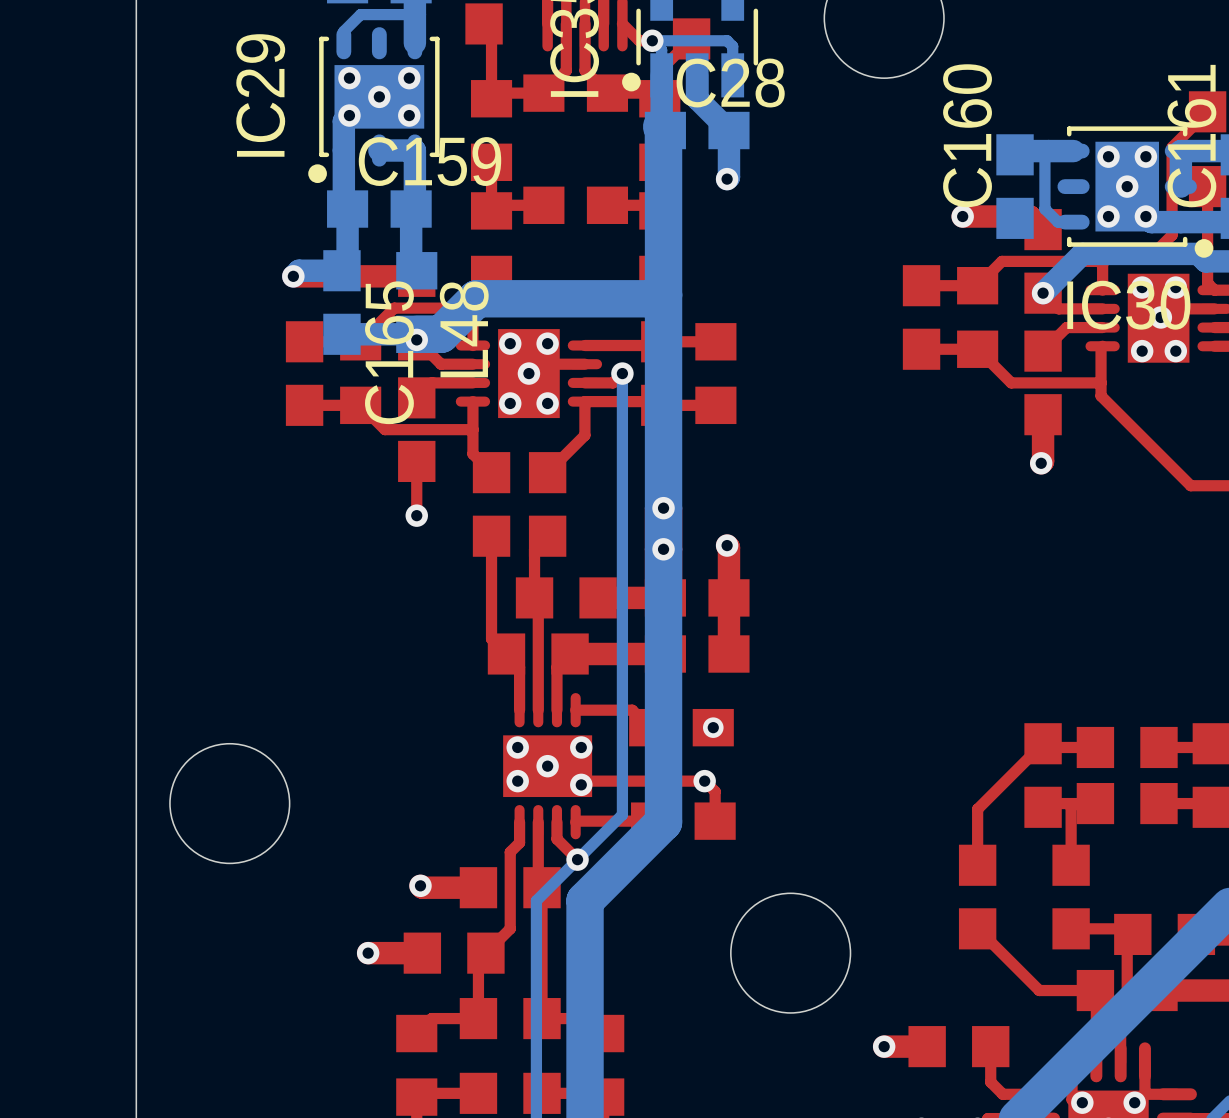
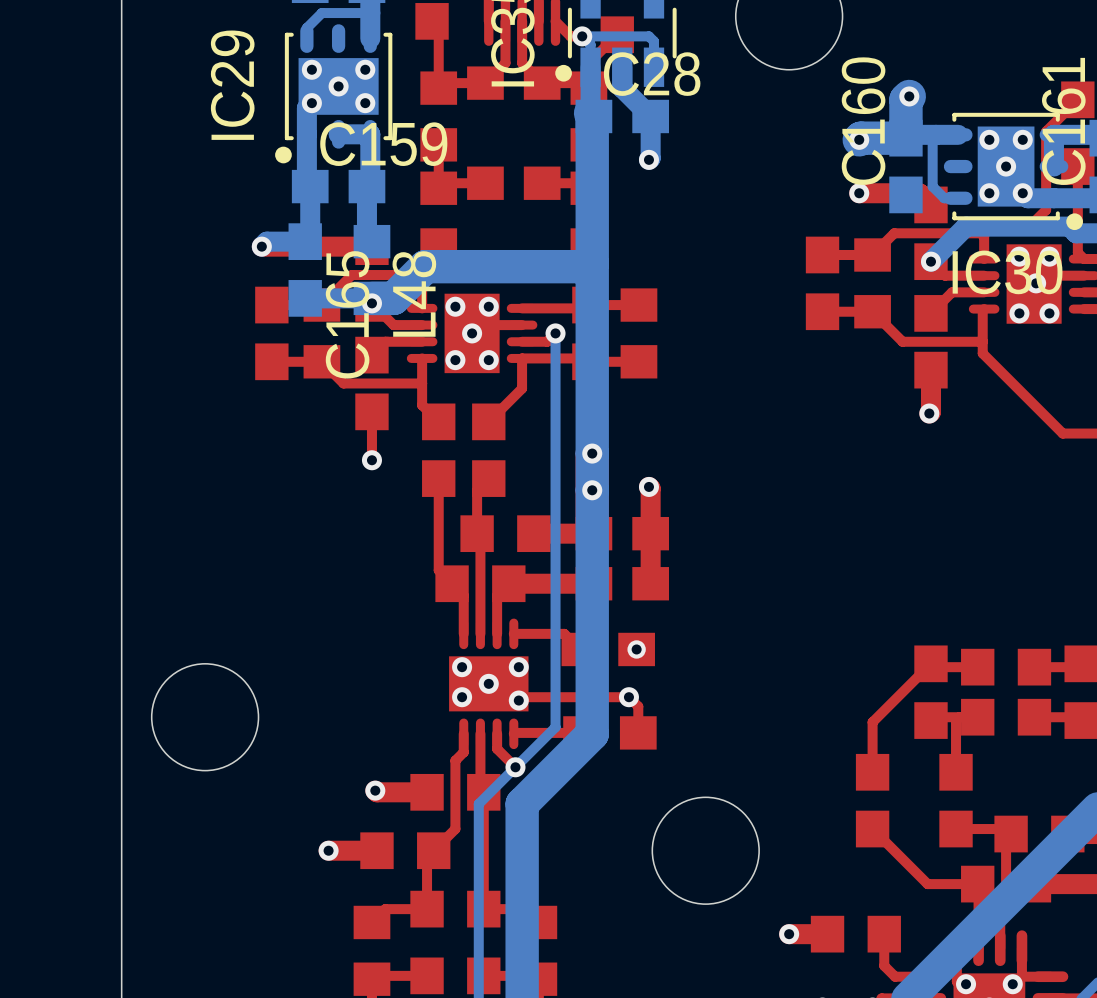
bottom track: none -> (909, 96) (905, 99) (905, 138) (860, 138) (859, 139)
via: none -> (909, 96)
via: none -> (859, 139)

